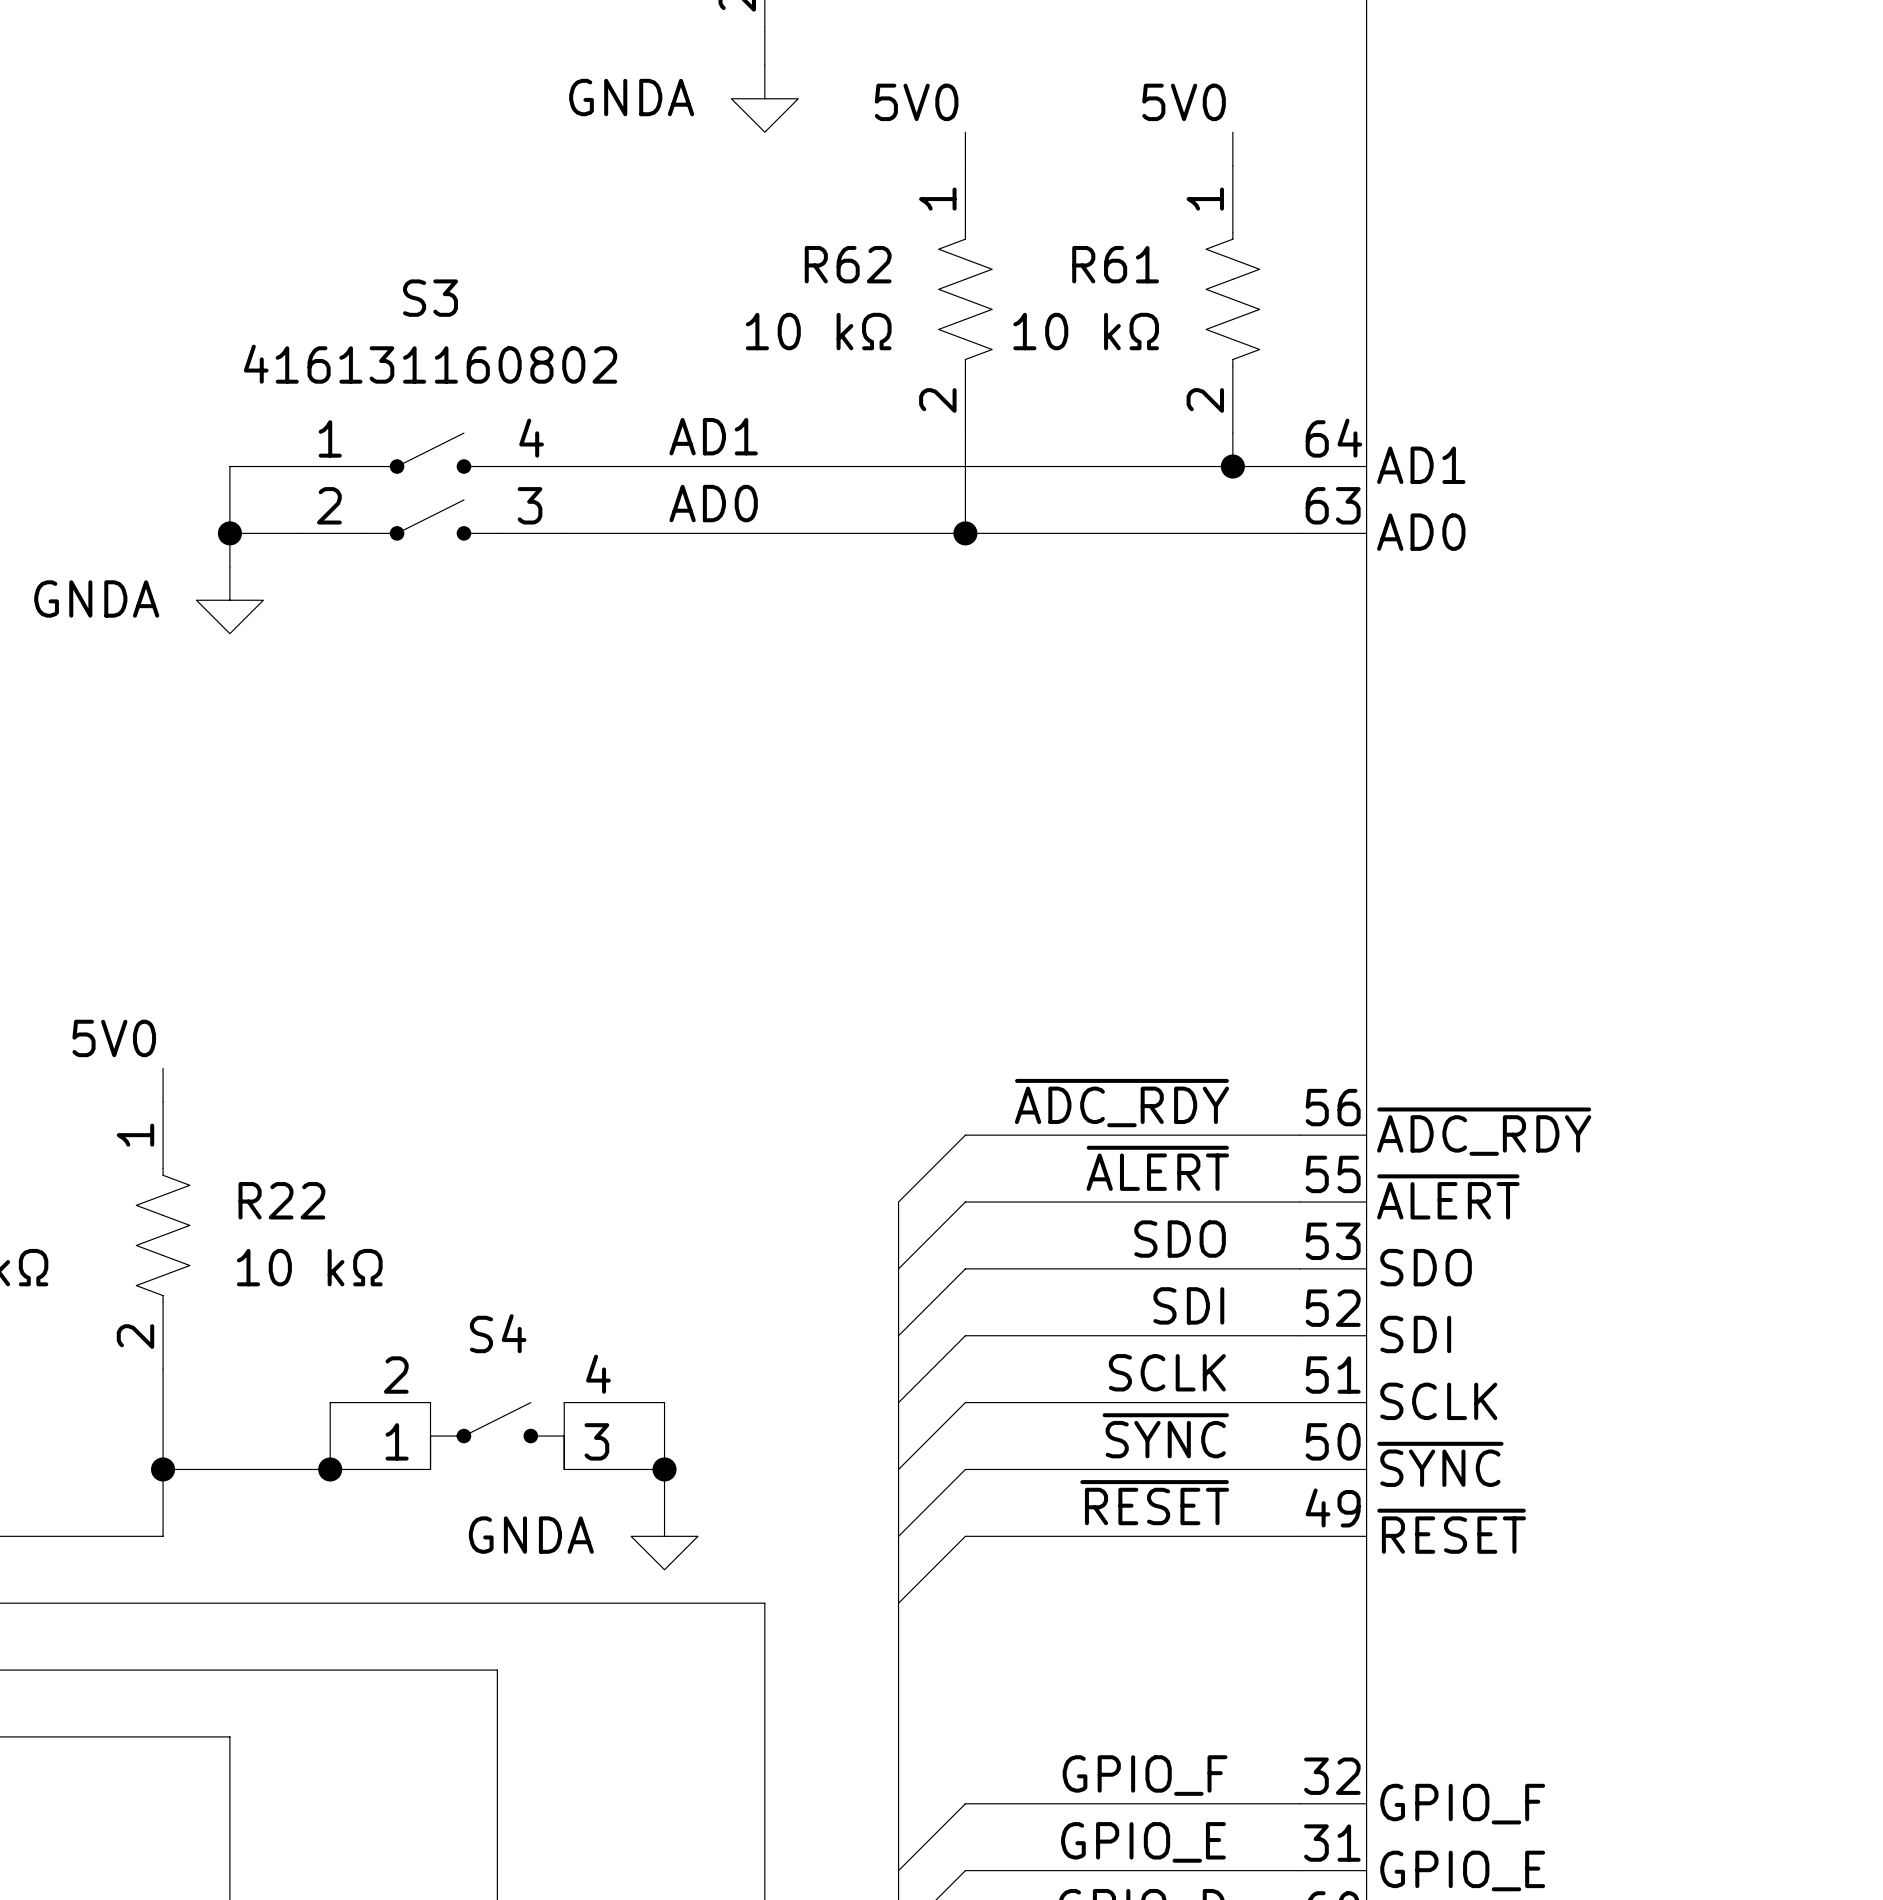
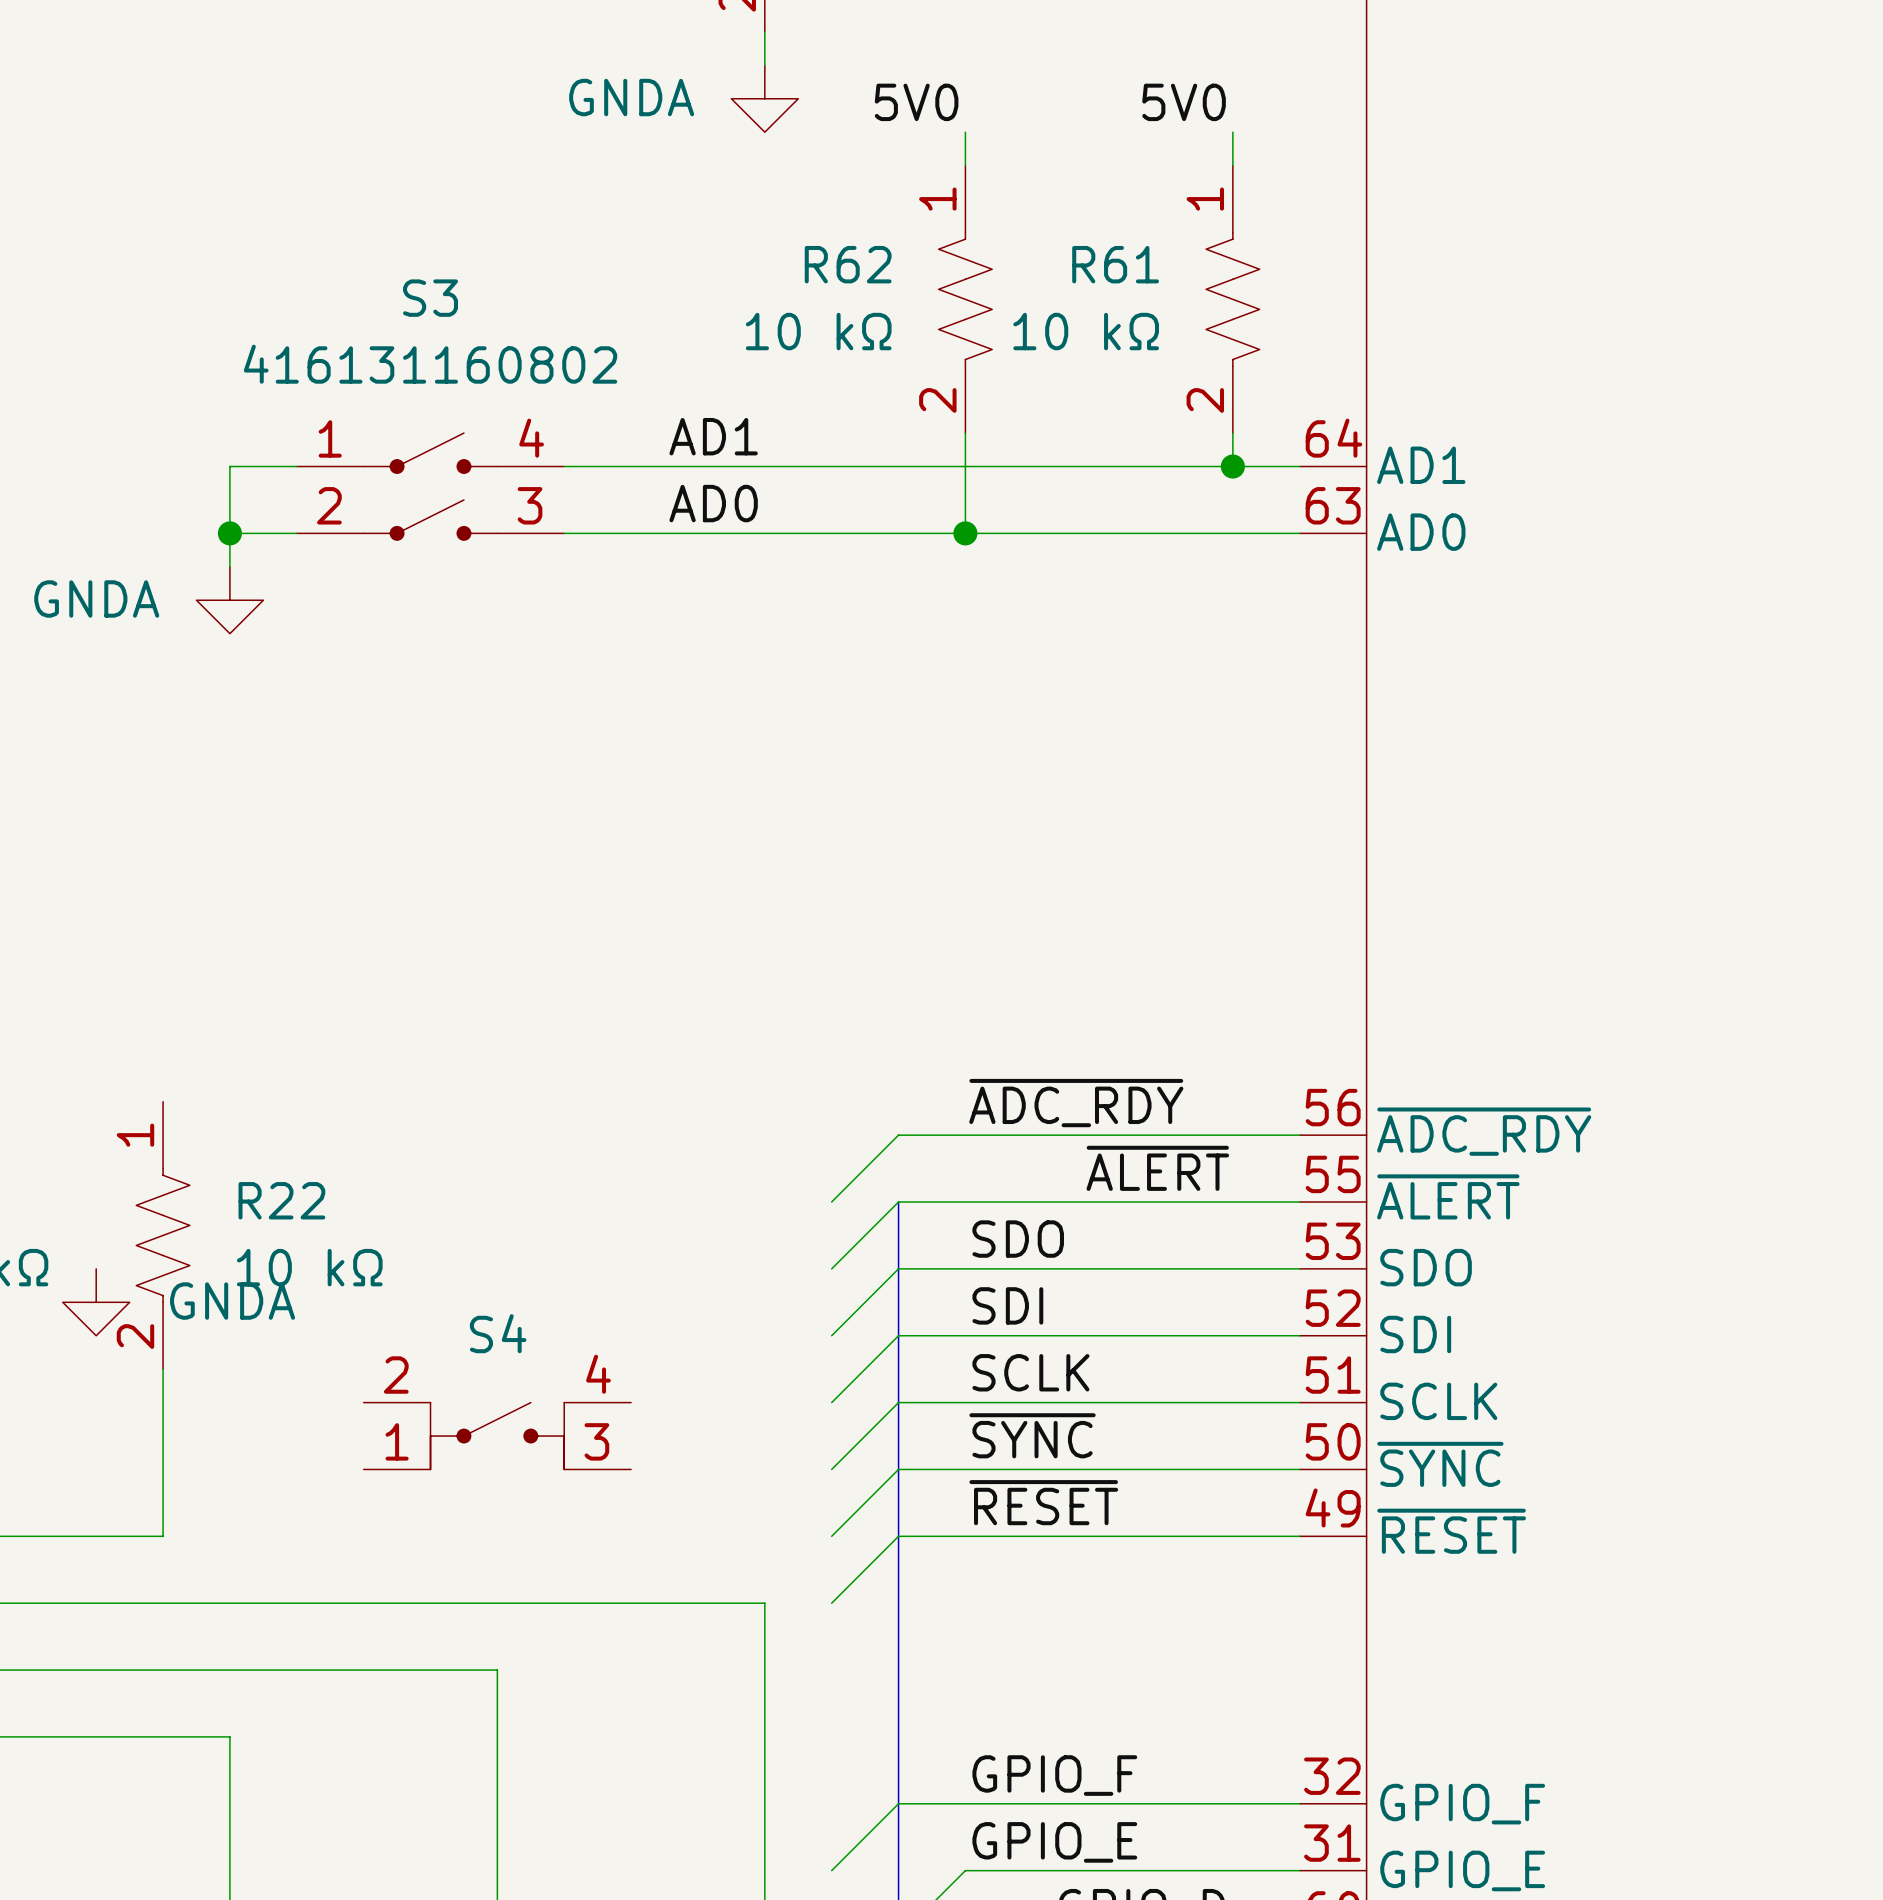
label: 5V0 (114, 1038) -> none
wire: (163, 1068) (163, 1101) -> none
label position: ~{ADC_RDY} (1121, 1103) -> ~{ADC_RDY} (1076, 1103)
wire: (965, 1135) (898, 1202) -> (965, 1135) (898, 1135) (831, 1202)
wire: (965, 1202) (898, 1268) -> (965, 1202) (898, 1202) (831, 1268)
label position: SDO (1180, 1239) -> SDO (1018, 1239)
wire: (965, 1268) (898, 1335) -> (965, 1268) (898, 1268) (831, 1335)
power symbol: none -> GNDA (96, 1302)
label position: SDI (1188, 1305) -> SDI (1007, 1305)
wire: (965, 1335) (898, 1402) -> (965, 1335) (898, 1335) (831, 1402)
label position: SCLK (1167, 1372) -> SCLK (1030, 1372)
wire: (363, 1402) (330, 1402) (330, 1469) -> none
wire: (631, 1402) (664, 1402) (664, 1502) -> none
wire: (965, 1402) (898, 1469) -> (965, 1402) (898, 1402) (831, 1469)
label position: ~{SYNC} (1165, 1435) -> ~{SYNC} (1032, 1435)
wire: (163, 1469) (363, 1469) -> none
junction: (163, 1469) -> none
junction: (330, 1469) -> none
wire: (631, 1469) (664, 1469) -> none
junction: (664, 1469) -> none
wire: (965, 1469) (898, 1536) -> (965, 1469) (898, 1469) (831, 1536)
label position: ~{RESET} (1154, 1502) -> ~{RESET} (1043, 1502)
power symbol: GNDA (664, 1536) -> none
wire: (965, 1536) (898, 1603) -> (965, 1536) (898, 1536) (831, 1603)
label position: GPIO_F (1145, 1775) -> GPIO_F (1054, 1775)
wire: (965, 1803) (898, 1870) -> (965, 1803) (898, 1803) (831, 1870)
label position: GPIO_E (1143, 1842) -> GPIO_E (1054, 1842)

